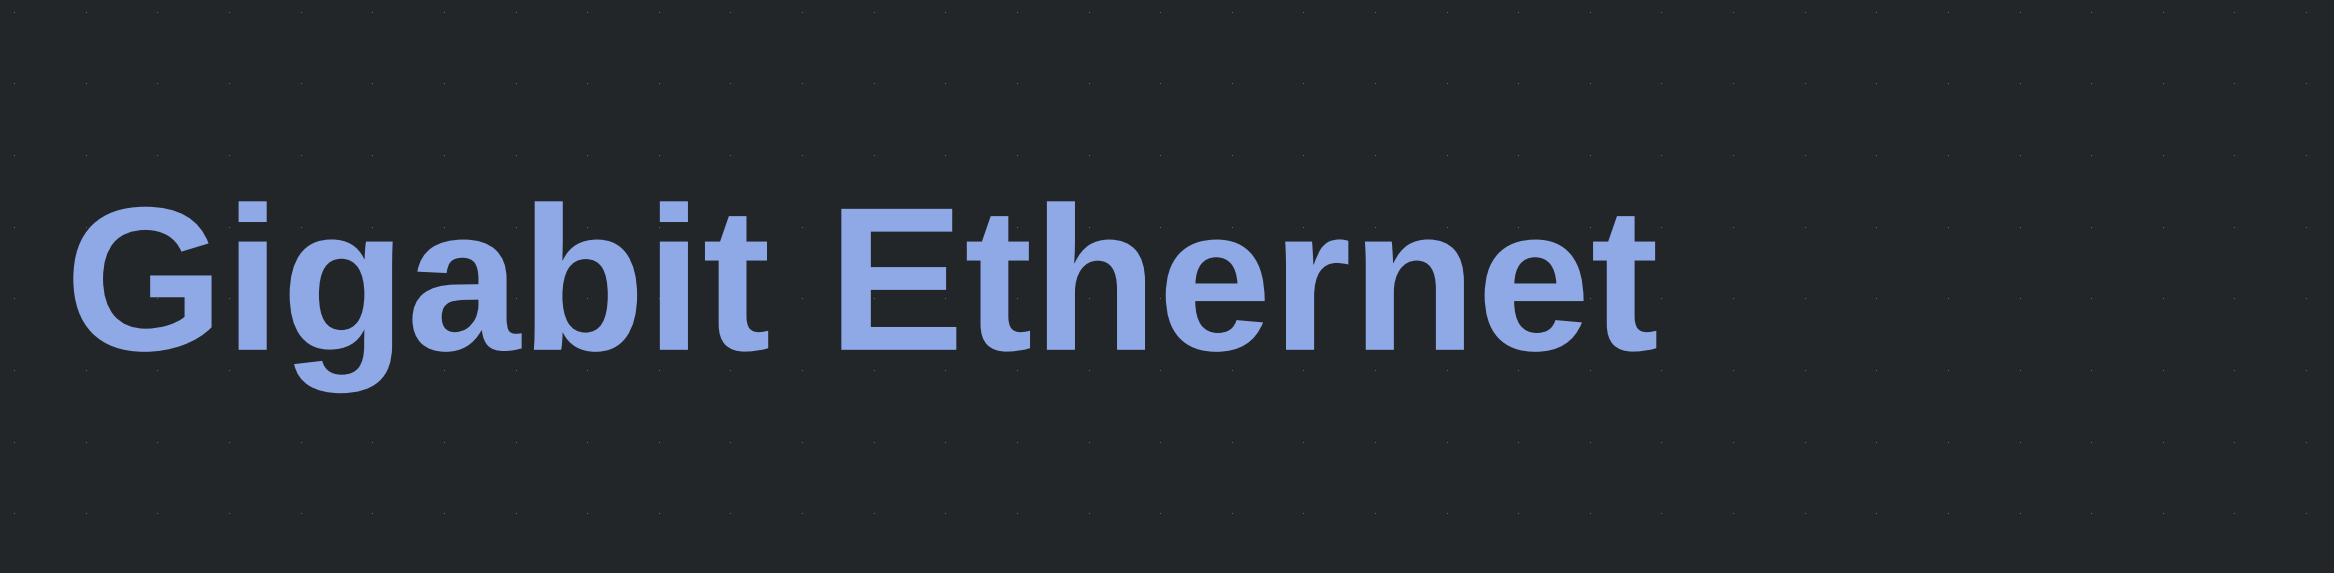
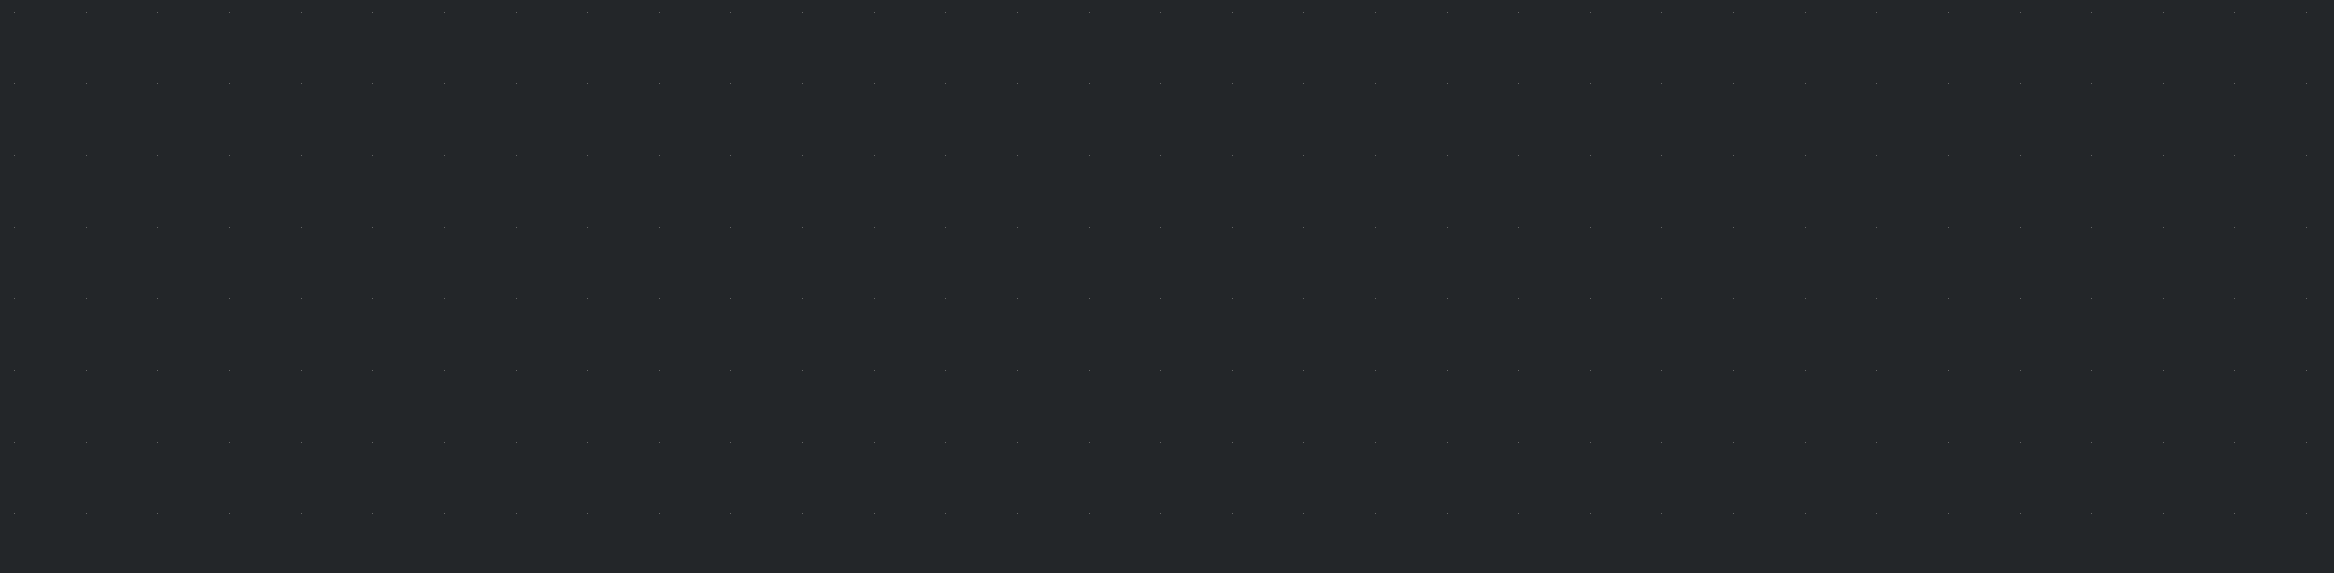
text: Gigabit Ethernet (864, 297) -> none

